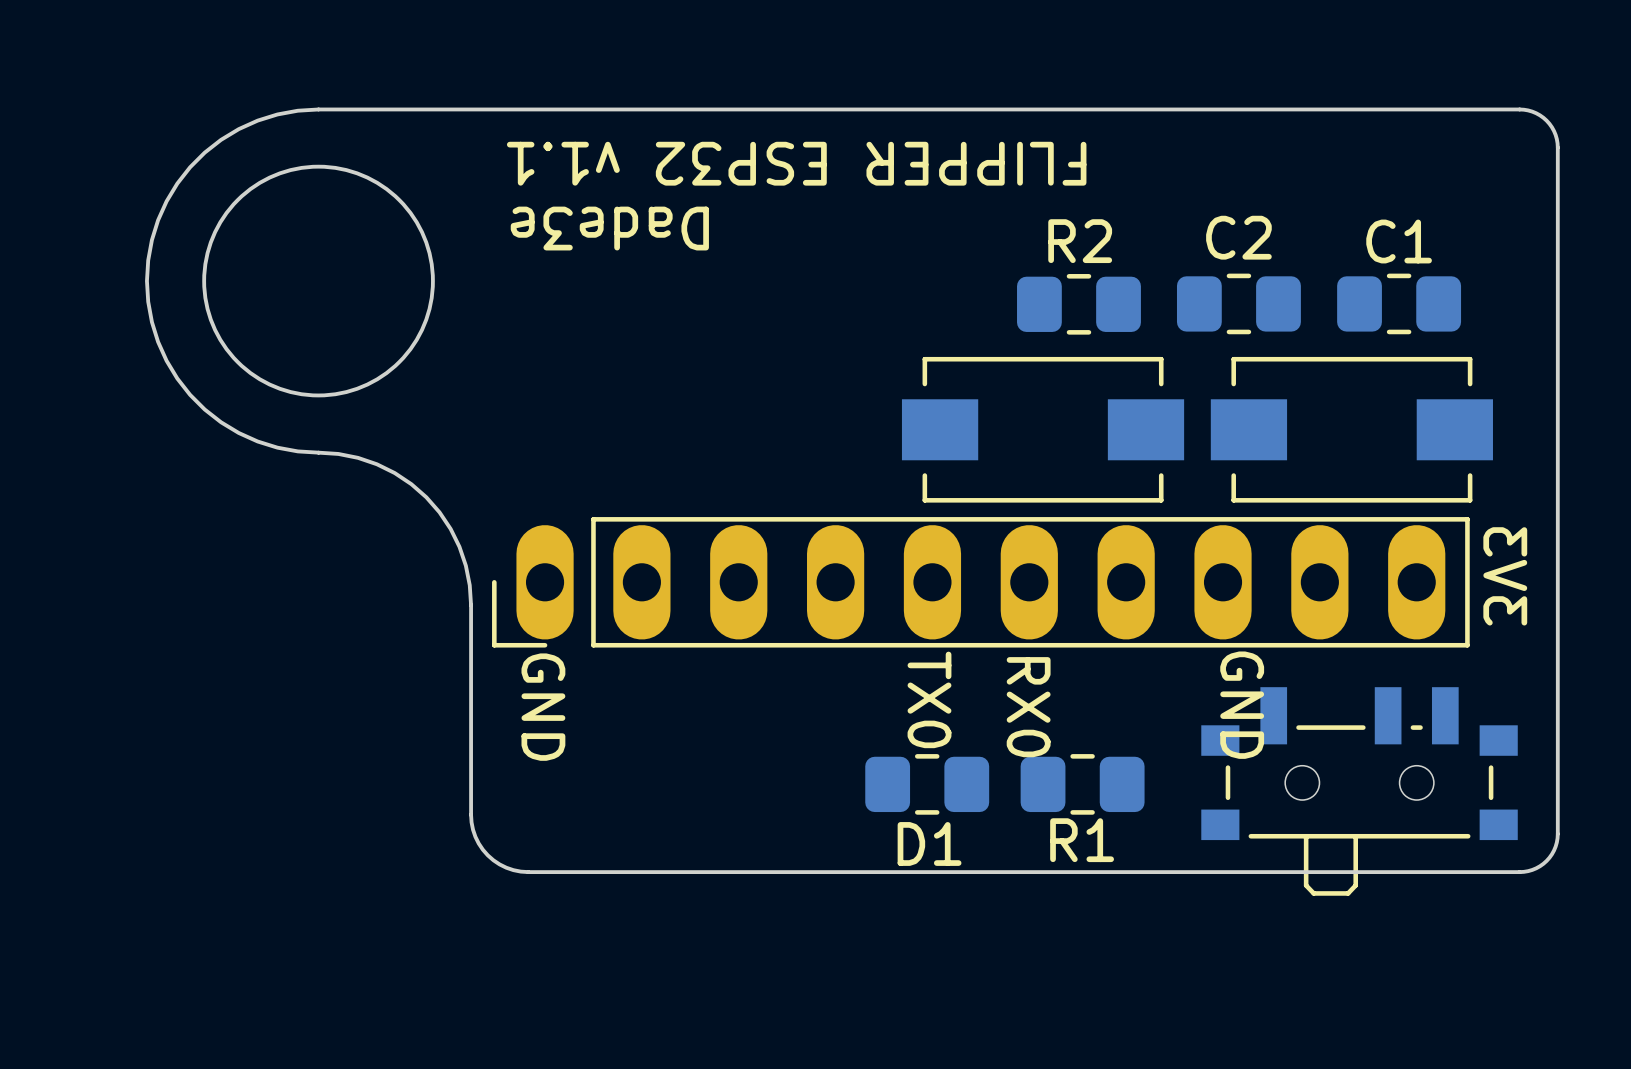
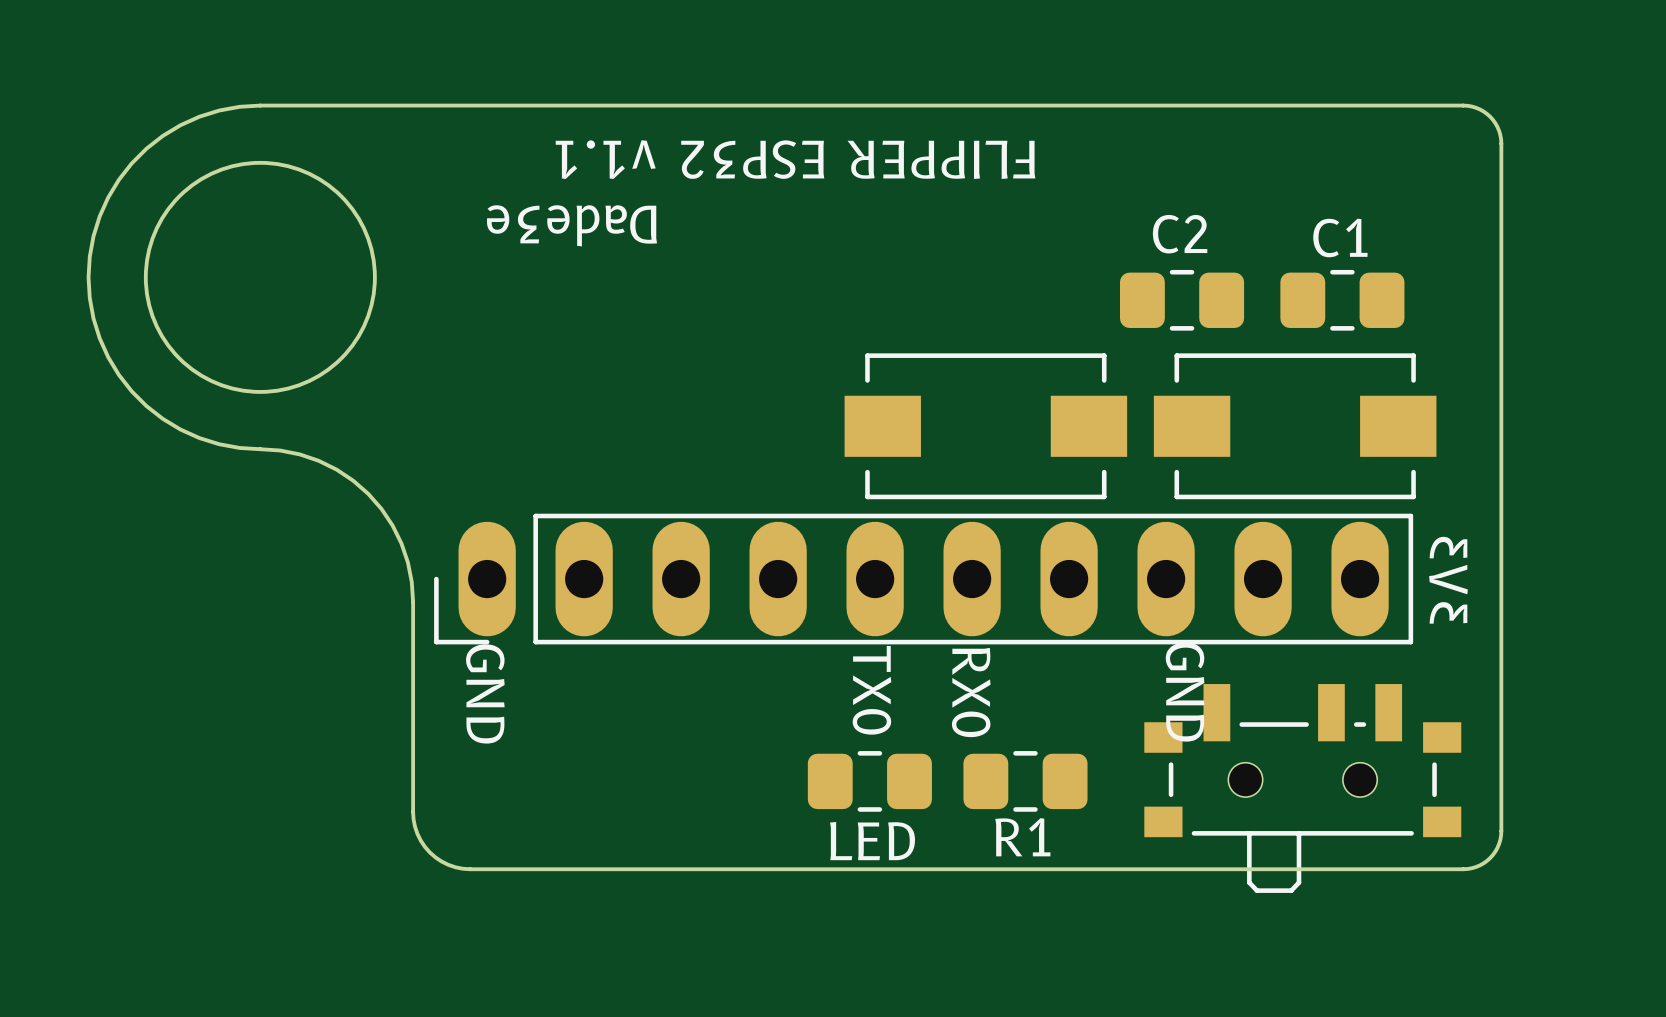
R2: (1078, 304) -> none
D1 name: D1 (929, 843) -> LED (872, 841)

